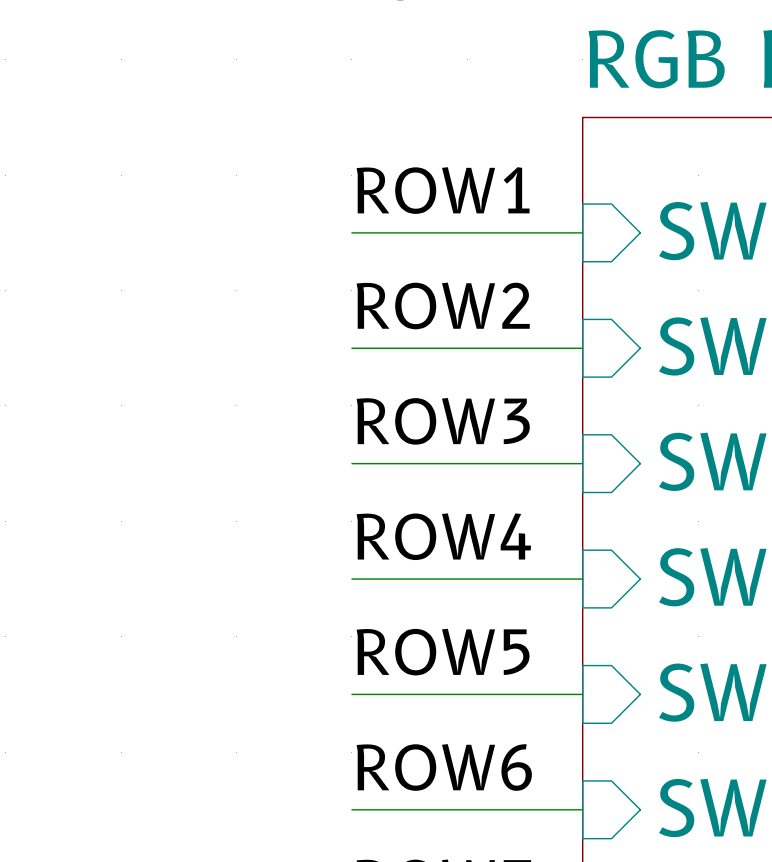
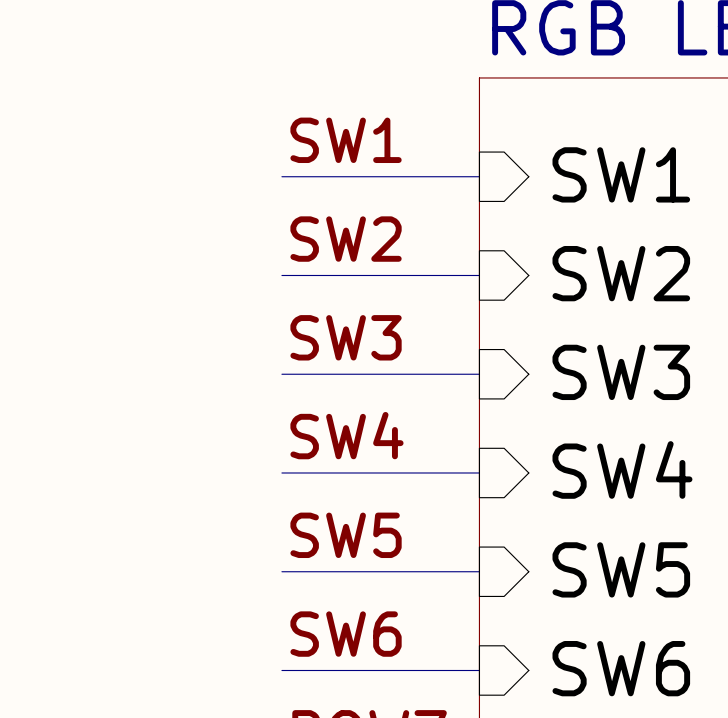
label: ROW1 (443, 190) -> SW1 (346, 140)
label: ROW2 (443, 305) -> SW2 (346, 239)
label: ROW3 (443, 421) -> SW3 (346, 337)
label: ROW4 (443, 536) -> SW4 (346, 435)
label: ROW5 (443, 652) -> SW5 (346, 535)
label: ROW6 (444, 767) -> SW6 (346, 634)

